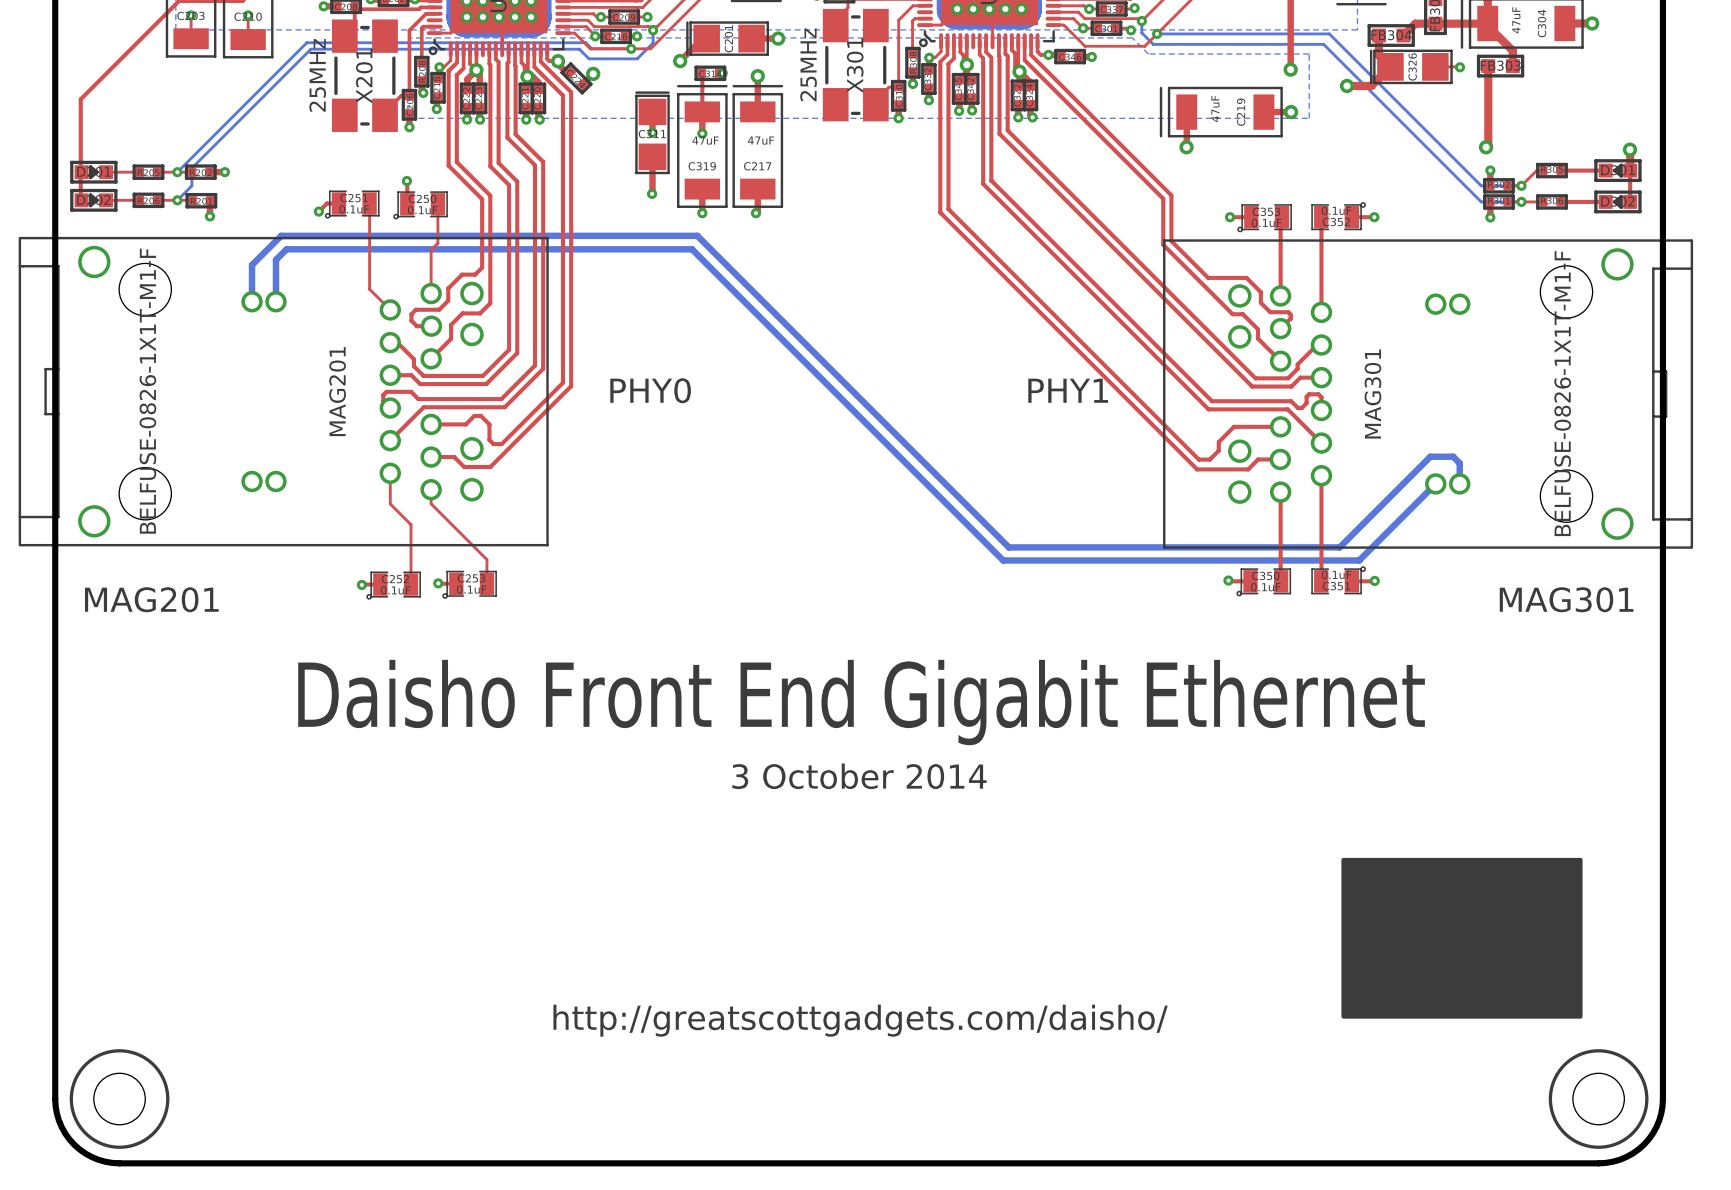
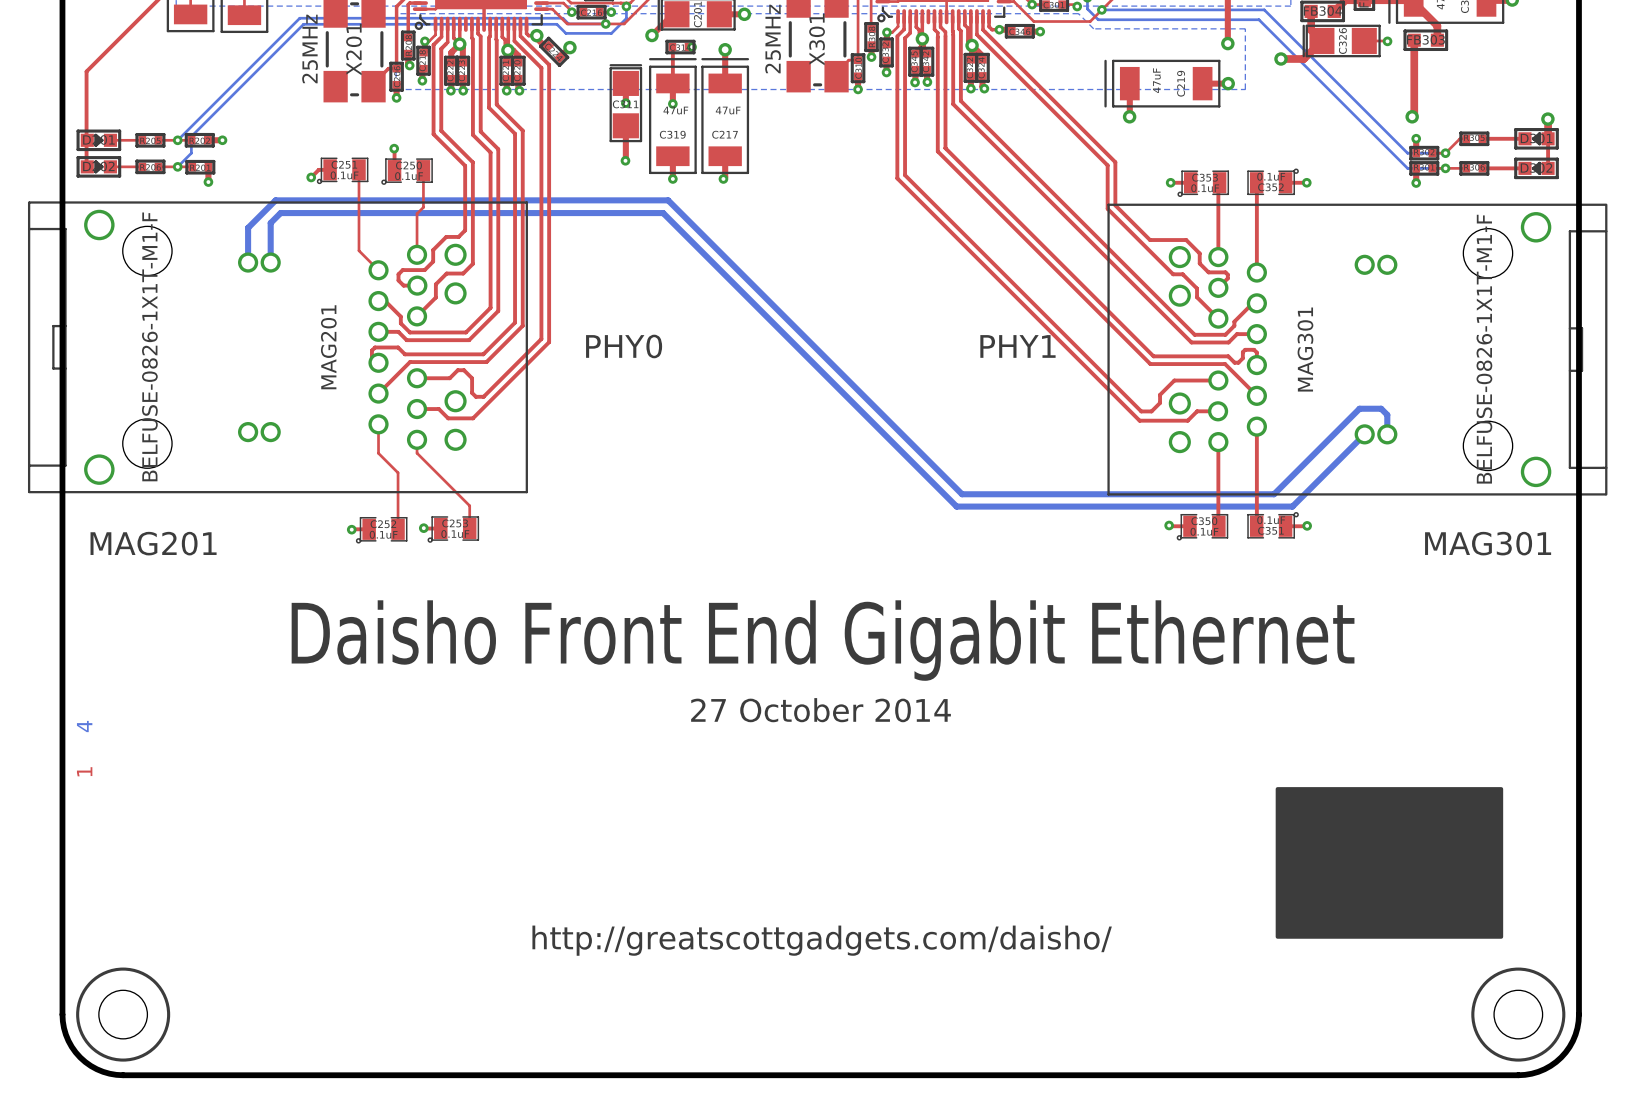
text: 3 October 2014 (859, 776) -> 27 October 2014 (821, 710)
text: none -> 4 (84, 726)
text: none -> 1 (84, 771)

